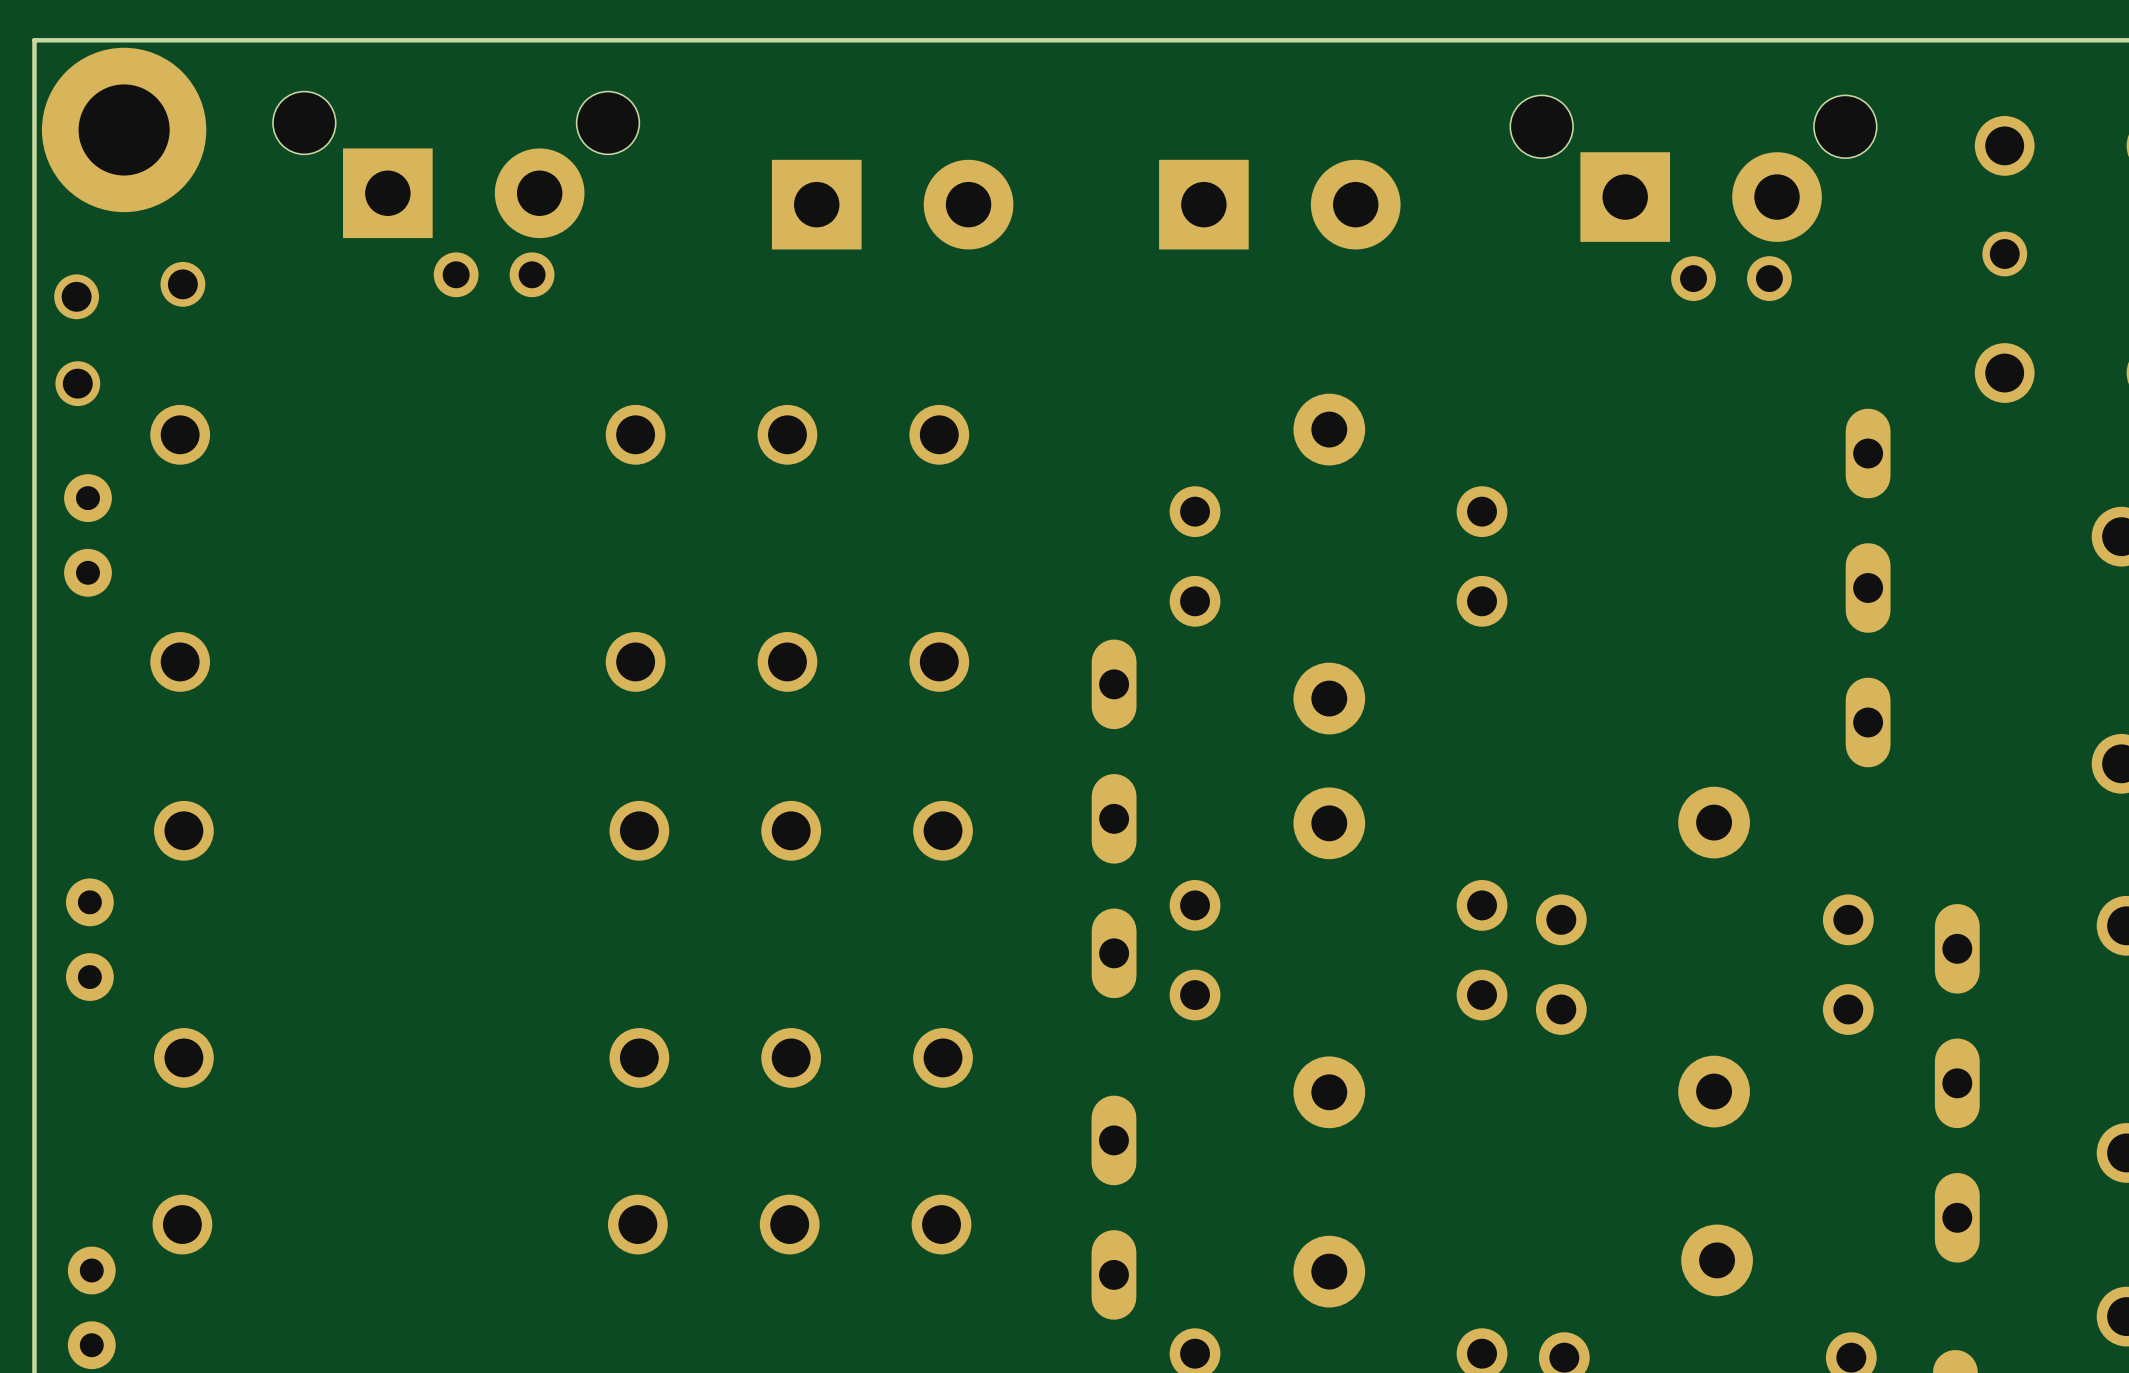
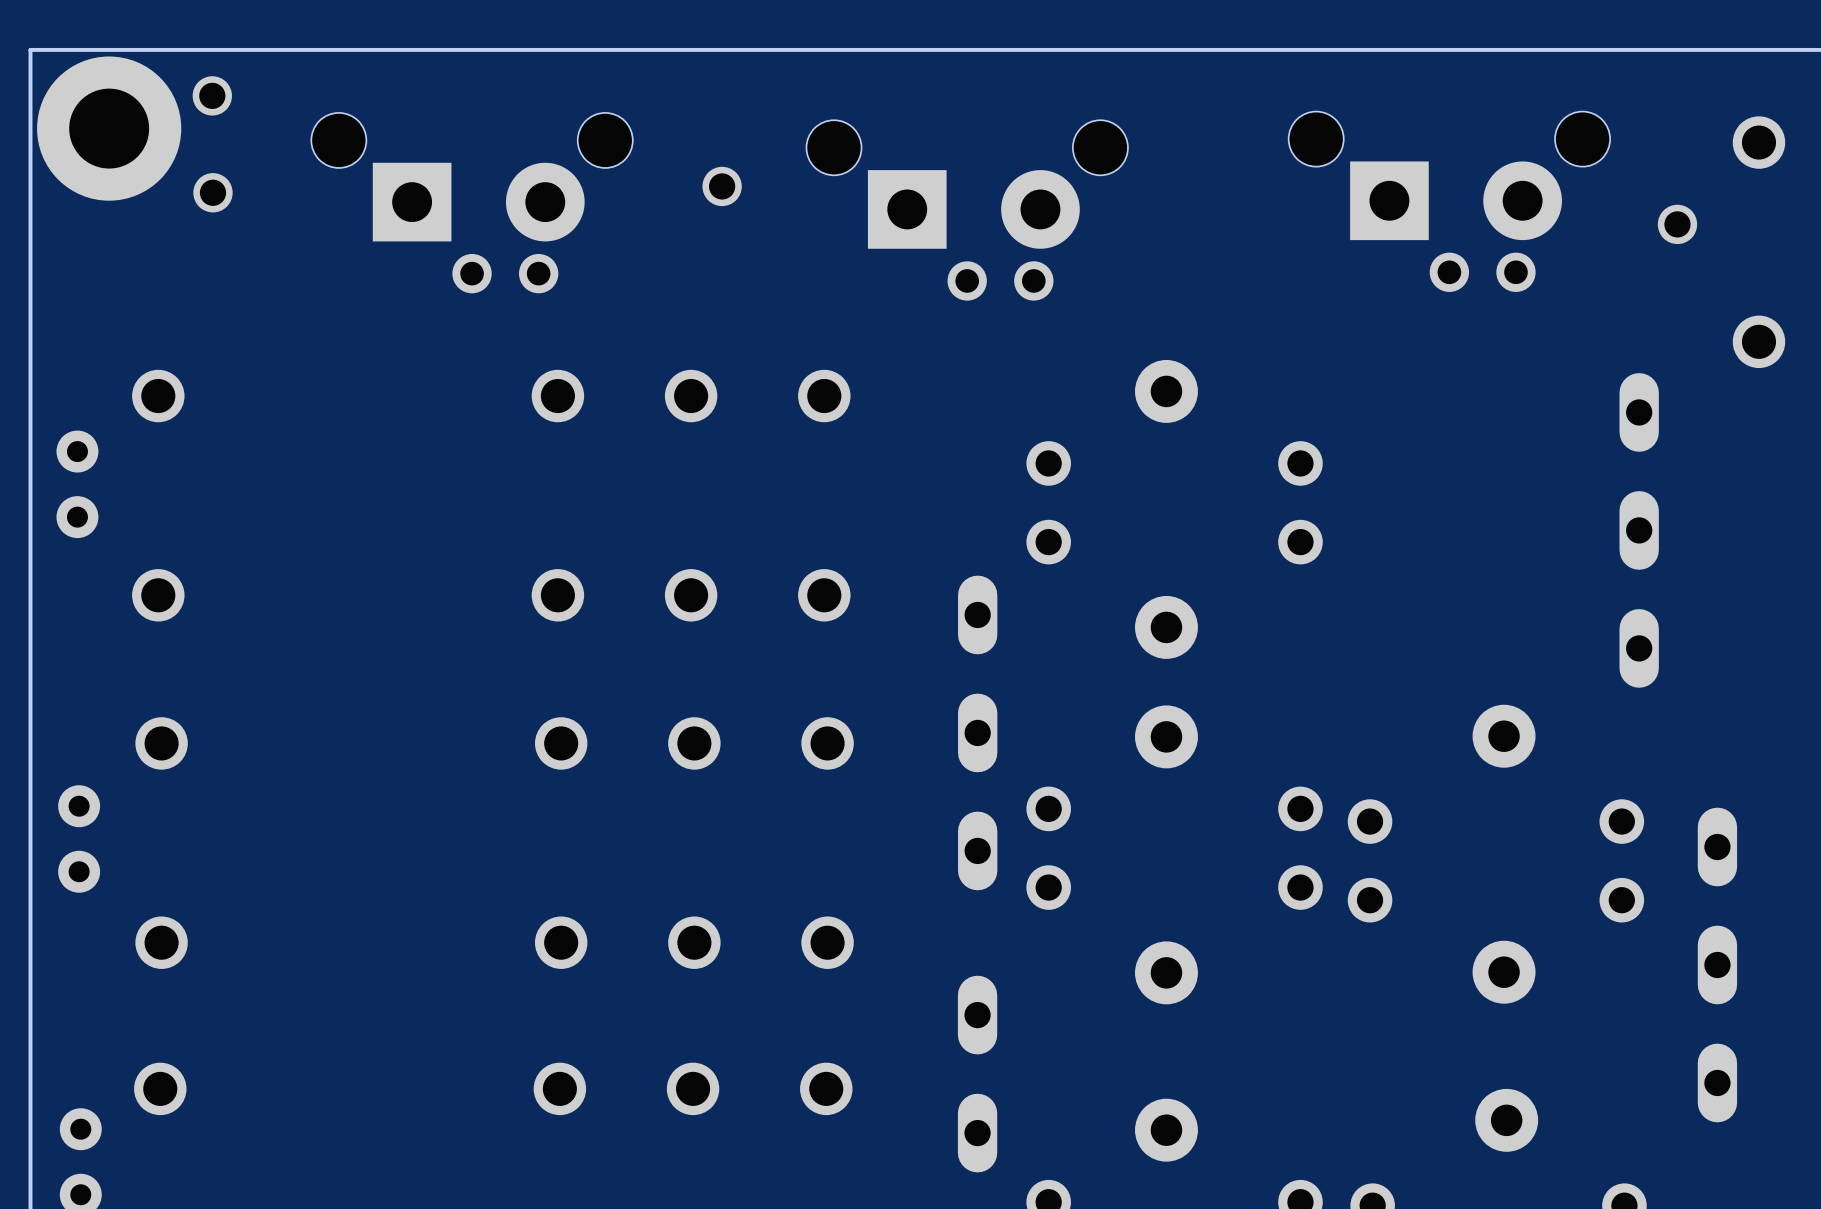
part: none -> (212, 95)
part position: (456, 194) -> (472, 203)
part: none -> (722, 186)
part position: (1693, 198) -> (1449, 201)
part: none -> (212, 192)
part: (892, 204) -> none
part: (1279, 204) -> none
part: none -> (967, 210)
part position: (2004, 253) -> (1677, 224)
part: (182, 284) -> none
part: (76, 296) -> none
part: (77, 383) -> none

